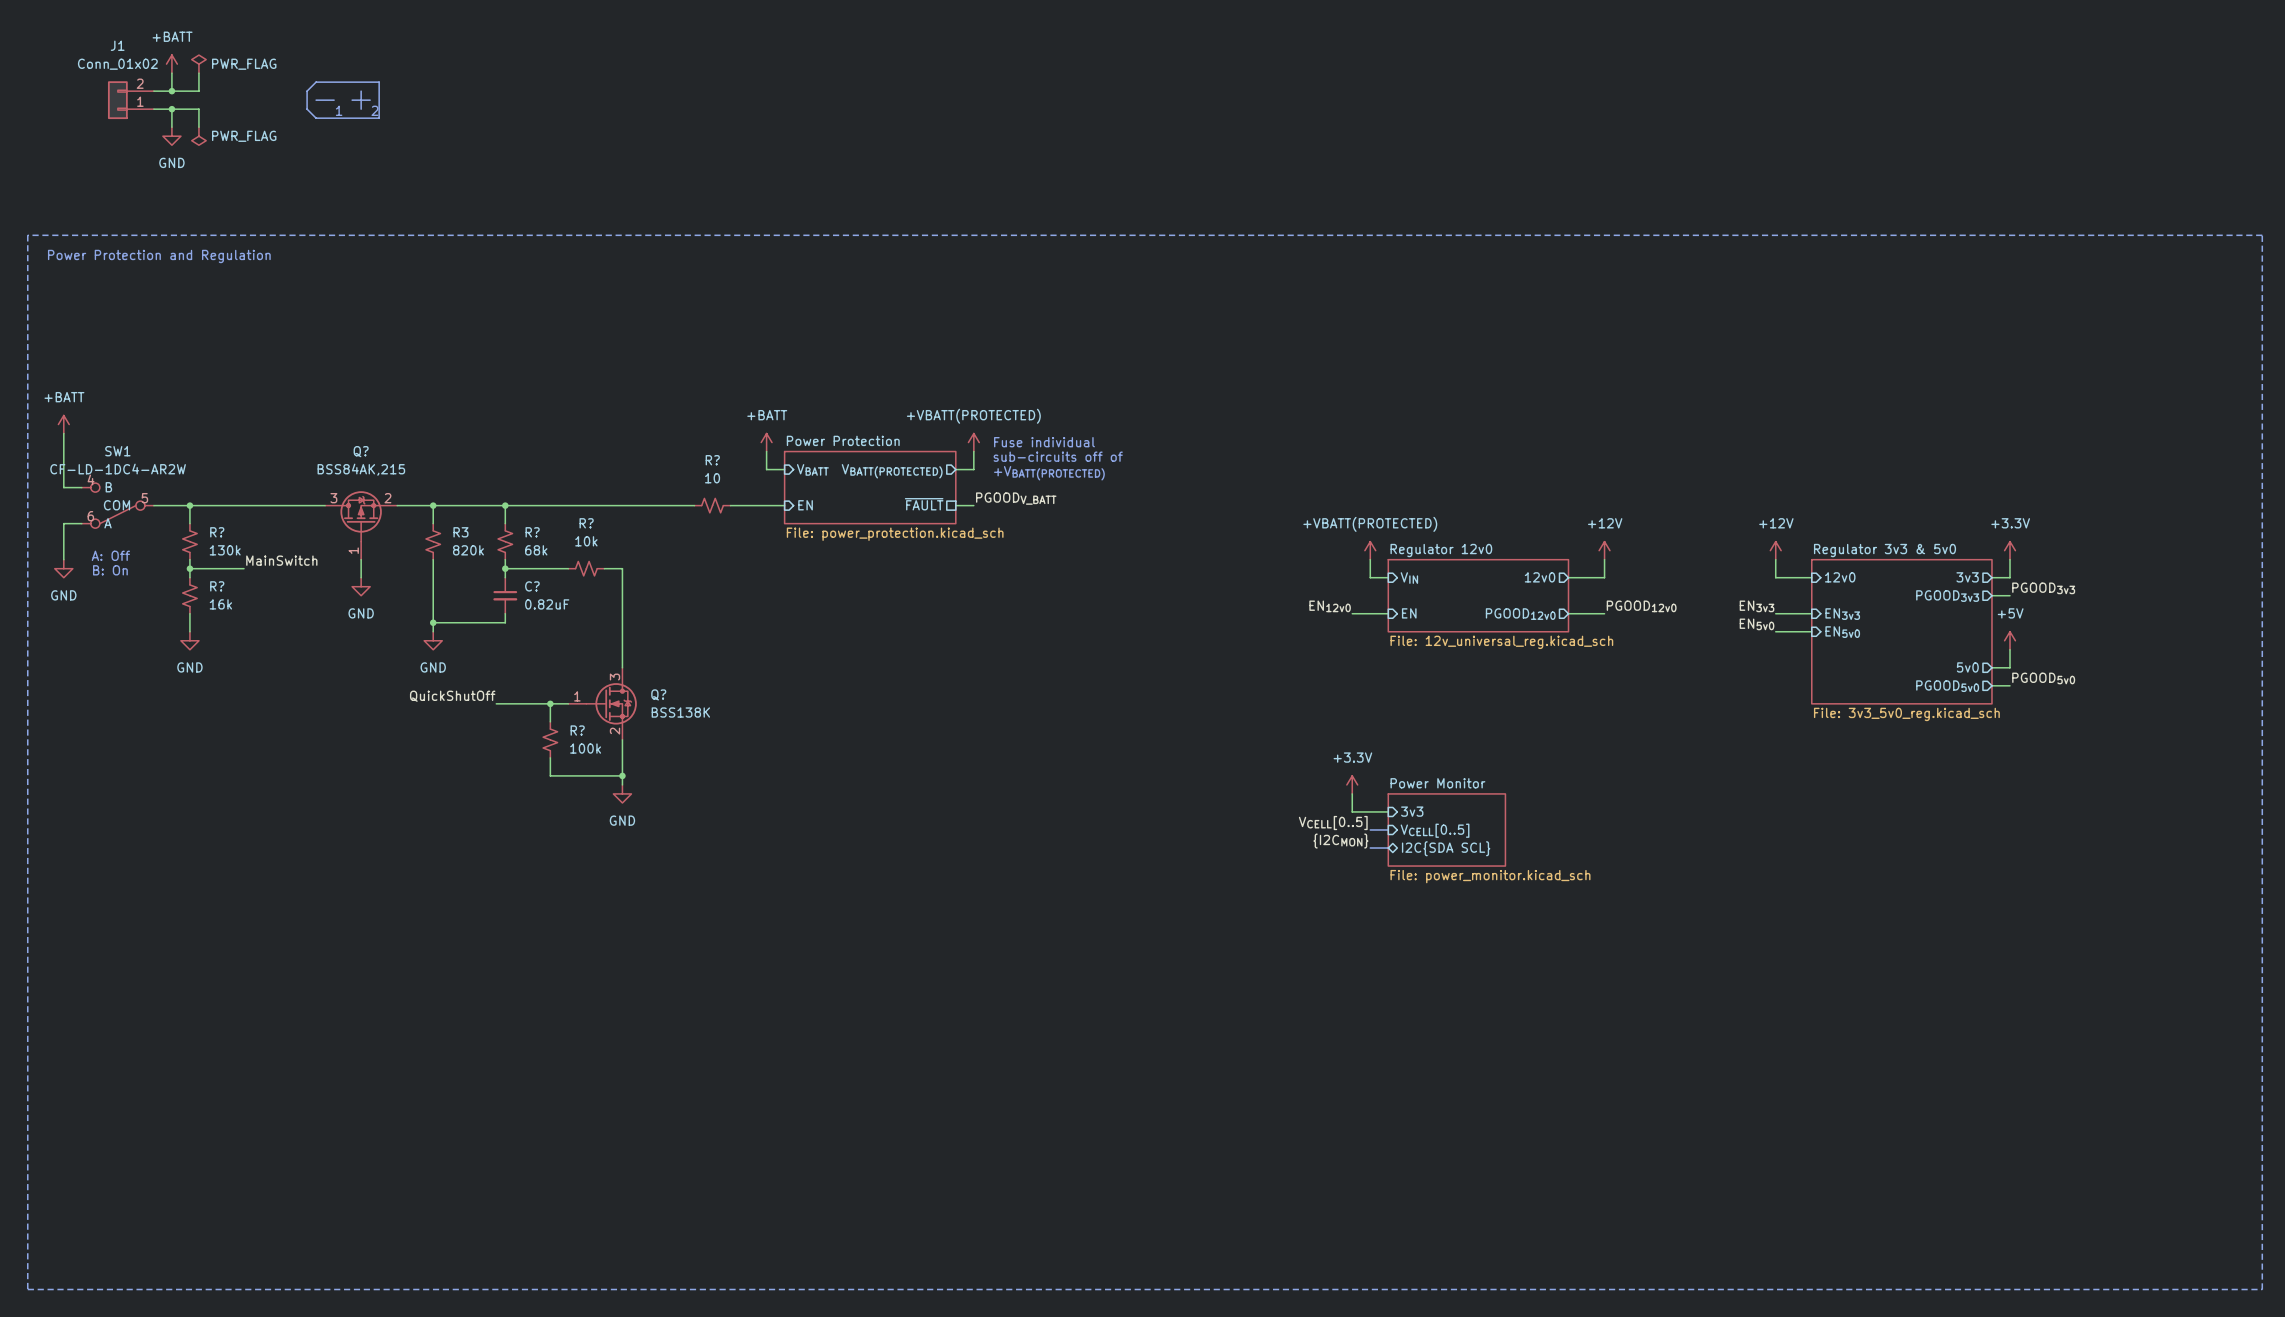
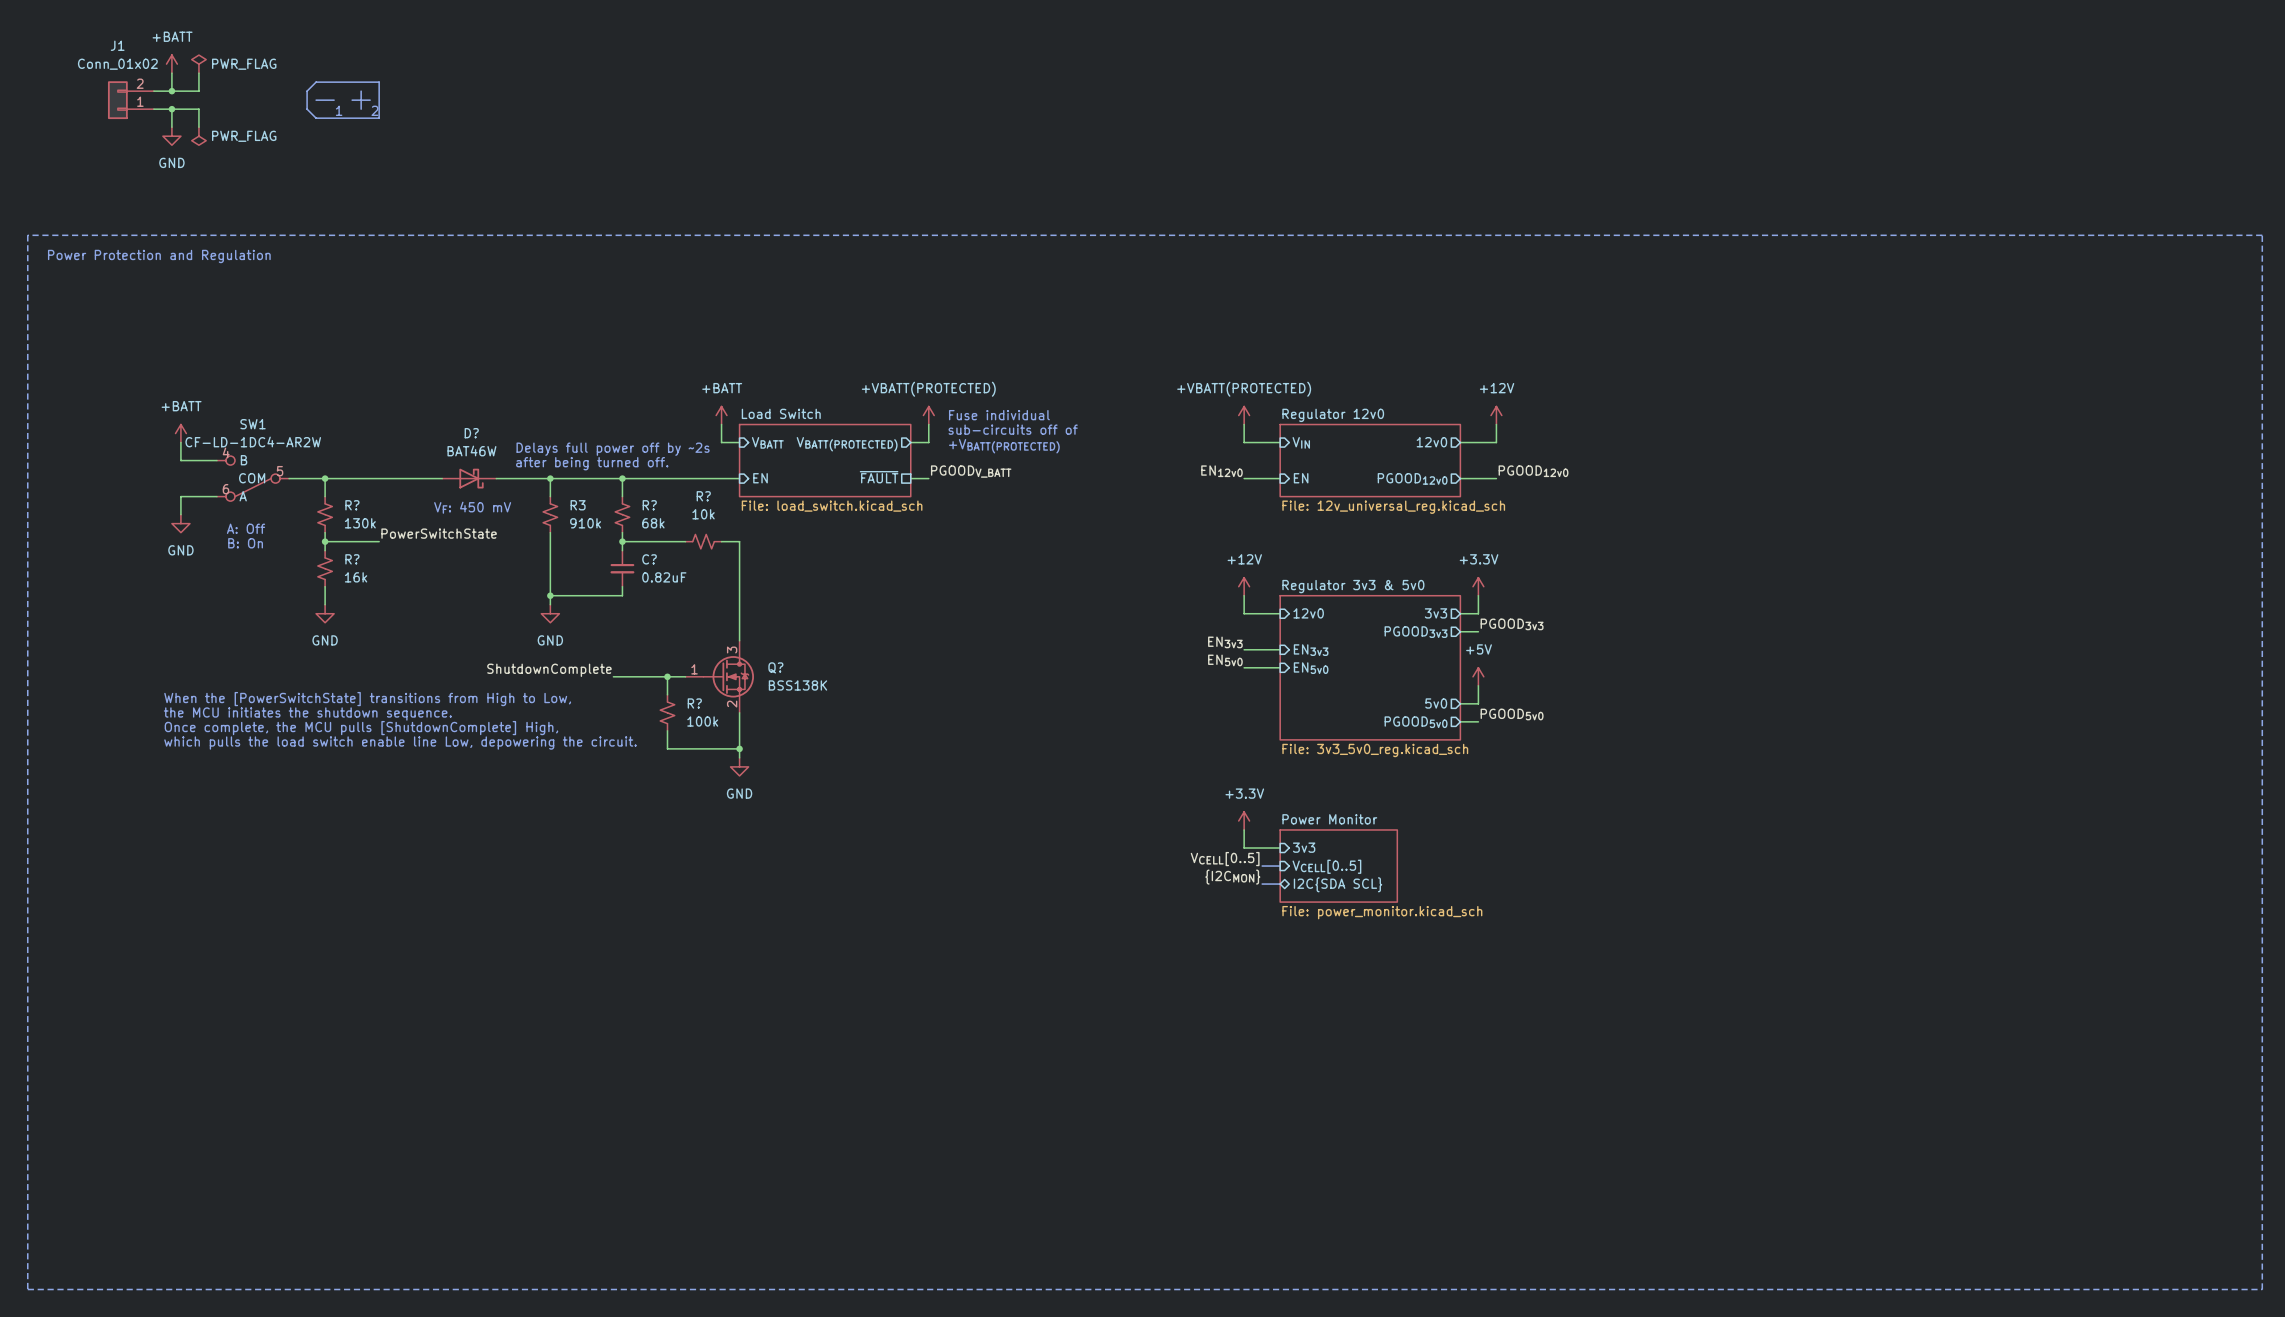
power symbol: none -> +VBATT(PROTECTED) (1244, 415)
power symbol: none -> +12V (1496, 415)
power symbol position: +BATT (63, 424) -> +BATT (180, 433)
wire: none -> (1244, 424) (1244, 442) (1280, 442)
wire: (63, 433) (63, 487) (81, 487) -> none
wire: none -> (180, 442) (180, 460) (216, 460)
power symbol position: +BATT (766, 442) -> +BATT (721, 415)
power symbol position: +VBATT(PROTECTED) (973, 442) -> +VBATT(PROTECTED) (928, 415)
text position: Fuse individual (1044, 442) -> Fuse individual (999, 415)
sheet pin: none -> 12v0 (1431, 442)
text: none -> Delays full power off by ~2s (613, 449)
wire: (766, 451) (766, 469) (784, 469) -> (721, 424) (721, 442) (739, 442)
wire: (973, 451) (973, 469) (955, 469) -> (928, 424) (928, 442) (910, 442)
text position: sub-circuits off of (1058, 456) -> sub-circuits off of (1013, 429)
sheet Load Switch: none -> File: load_switch.kicad_sch (825, 460)
text: none -> after being turned off. (592, 463)
sheet pin position: VBATT (812, 469) -> VBATT (767, 442)
sheet pin position: VBATT(PROTECTED) (892, 471) -> VBATT(PROTECTED) (847, 444)
text position: +VBATT(PROTECTED) (1049, 473) -> +VBATT(PROTECTED) (1004, 446)
wire: none -> (289, 478) (442, 478)
junction: none -> (325, 478)
D?: none -> BAT46W (469, 478)
wire: none -> (496, 478) (739, 478)
junction: none -> (550, 478)
junction: none -> (622, 478)
sheet Power Protection: File: power_protection.kicad_sch (870, 487) -> none
wire: none -> (216, 496) (180, 496) (180, 514)
label position: PGOODV_BATT (1016, 498) -> PGOODV_BATT (971, 471)
sheet pin position: ~{FAULT} (924, 504) -> ~{FAULT} (879, 477)
SW1 position: (117, 505) -> (253, 478)
wire: (153, 505) (325, 505) -> none
wire: (189, 505) (189, 523) -> (325, 478) (325, 496)
junction: (189, 505) -> none
wire: (397, 505) (694, 505) -> none
wire: (433, 505) (433, 523) -> (550, 478) (550, 496)
junction: (433, 505) -> none
wire: (505, 505) (505, 523) -> (622, 478) (622, 496)
junction: (505, 505) -> none
R?: 10 (712, 505) -> none
wire: (730, 505) (784, 505) -> none
sheet pin position: EN (805, 505) -> EN (760, 478)
wire: (955, 505) (973, 505) -> (910, 478) (928, 478)
text: none -> VF: 450 mV (472, 507)
wire: (81, 523) (63, 523) (63, 559) -> none
power symbol: none -> GND (180, 523)
Q?: BSS84AK,215 (361, 525) -> none
label: none -> PowerSwitchState (439, 533)
R? position: (189, 541) -> (325, 514)
junction: none -> (325, 541)
R3 position: (433, 541) -> (550, 514)
R? position: (505, 541) -> (622, 514)
junction: none -> (622, 541)
wire: none -> (721, 541) (739, 541) (739, 640)
R3 value: 820k (468, 550) -> 910k (585, 523)
power symbol: +VBATT(PROTECTED) (1370, 550) -> none
power symbol: +12V (1604, 550) -> none
power symbol: +12V (1775, 550) -> none
power symbol: +3.3V (2010, 550) -> none
text position: A: Off (110, 555) -> A: Off (246, 528)
wire: (189, 559) (189, 577) -> (325, 532) (325, 550)
wire: (361, 559) (361, 577) -> none
wire: (433, 559) (433, 631) -> (550, 532) (550, 604)
wire: (505, 559) (505, 577) -> (622, 532) (622, 550)
wire: (1370, 559) (1370, 577) (1388, 577) -> none
wire: (1604, 559) (1604, 577) (1568, 577) -> (1496, 424) (1496, 442) (1460, 442)
wire: (1775, 559) (1775, 577) (1811, 577) -> none
wire: (2010, 559) (2010, 577) (1991, 577) -> none
label: MainSwitch (281, 560) -> none
power symbol: GND (63, 568) -> none
wire: (189, 568) (244, 568) -> (325, 541) (379, 541)
junction: (189, 568) -> none
wire: (505, 568) (568, 568) -> (622, 541) (685, 541)
junction: (505, 568) -> none
R? position: (586, 568) -> (703, 541)
wire: (604, 568) (622, 568) (622, 586) -> none
text position: B: On (110, 570) -> B: On (245, 543)
sheet pin: 12v0 (1540, 577) -> none
sheet pin: 12v0 (1840, 577) -> none
sheet pin: 3v3 (1967, 577) -> none
sheet pin position: VIN (1409, 578) -> VIN (1301, 442)
power symbol position: GND (361, 586) -> GND (325, 613)
power symbol: none -> +12V (1244, 586)
power symbol: none -> +3.3V (1478, 586)
label: PGOOD3v3 (2043, 588) -> none
R? position: (189, 595) -> (325, 568)
C? position: (505, 595) -> (622, 568)
junction: none -> (550, 595)
wire: (622, 595) (622, 667) -> (622, 595) (550, 595)
wire: none -> (1244, 595) (1244, 613) (1280, 613)
wire: none -> (1478, 595) (1478, 613) (1460, 613)
sheet Regulator 12v0 position: (1478, 595) -> (1370, 460)
wire: (1991, 595) (2010, 595) -> none
sheet pin: PGOOD3v3 (1947, 596) -> none
label position: EN12v0 (1330, 606) -> EN12v0 (1221, 471)
label position: PGOOD12v0 (1641, 606) -> PGOOD12v0 (1533, 471)
label: EN3v3 (1757, 606) -> none
wire: (189, 613) (189, 631) -> (325, 586) (325, 604)
wire: (505, 613) (505, 622) (433, 622) -> none
power symbol: none -> GND (550, 613)
sheet pin: none -> 12v0 (1308, 613)
wire: (1352, 613) (1388, 613) -> (1244, 478) (1280, 478)
sheet pin position: EN (1409, 613) -> EN (1301, 478)
sheet pin: none -> 3v3 (1436, 613)
wire: (1568, 613) (1604, 613) -> (1460, 478) (1496, 478)
wire: (1775, 613) (1811, 613) -> none
sheet pin position: PGOOD12v0 (1520, 614) -> PGOOD12v0 (1412, 478)
sheet pin: EN3v3 (1842, 614) -> none
junction: (433, 622) -> none
label: none -> PGOOD3v3 (1512, 624)
label: EN5v0 (1757, 624) -> none
wire: (1775, 631) (1811, 631) -> none
sheet Regulator 3v3 & 5v0 position: (1901, 631) -> (1370, 667)
sheet pin: none -> PGOOD3v3 (1416, 632)
sheet pin: EN5v0 (1842, 632) -> none
power symbol: GND (189, 640) -> none
power symbol: GND (433, 640) -> none
power symbol: +5V (2010, 640) -> none
label: none -> EN3v3 (1225, 642)
wire: none -> (1244, 649) (1280, 649)
wire: (2010, 649) (2010, 667) (1991, 667) -> none
sheet pin: none -> EN3v3 (1311, 650)
label: none -> EN5v0 (1225, 660)
wire: none -> (1244, 667) (1280, 667)
sheet pin: 5v0 (1967, 667) -> none
sheet pin: none -> EN5v0 (1311, 668)
label: none -> ShutdownComplete (549, 670)
junction: none -> (667, 676)
power symbol: none -> +5V (1478, 676)
label: PGOOD5v0 (2043, 678) -> none
wire: none -> (1478, 685) (1478, 703) (1460, 703)
wire: (1991, 685) (2010, 685) -> none
sheet pin: PGOOD5v0 (1947, 686) -> none
label: QuickShutOff (452, 696) -> none
text: none -> When the [PowerSwitchState] transitions from High to Low, (367, 699)
wire: (496, 703) (568, 703) -> (613, 676) (685, 676)
wire: (550, 703) (550, 721) -> (667, 676) (667, 694)
junction: (550, 703) -> none
Q? position: (602, 703) -> (719, 676)
sheet pin: none -> 5v0 (1436, 703)
text: none -> the MCU initiates the shutdown sequence. (307, 714)
label: none -> PGOOD5v0 (1512, 714)
wire: none -> (1460, 721) (1478, 721)
sheet pin: none -> PGOOD5v0 (1416, 722)
text: none -> Once complete, the MCU pulls [ShutdownComplete] High, (361, 728)
R? position: (550, 739) -> (667, 712)
wire: (622, 739) (622, 784) -> (739, 712) (739, 757)
text: none -> which pulls the load switch enable line Low, depowering the circuit. (400, 743)
junction: none -> (739, 748)
wire: (550, 757) (550, 775) (622, 775) -> (667, 730) (667, 748) (739, 748)
power symbol: none -> GND (739, 766)
junction: (622, 775) -> none
power symbol position: +3.3V (1352, 784) -> +3.3V (1244, 820)
power symbol: GND (622, 793) -> none
wire: (1352, 793) (1352, 811) (1388, 811) -> (1244, 829) (1244, 848) (1280, 848)
sheet pin: 3v3 (1412, 811) -> none
label position: VCELL[0..5] (1333, 823) -> VCELL[0..5] (1225, 859)
bus: (1370, 829) (1388, 829) -> (1262, 866) (1280, 866)
sheet Power Monitor position: (1446, 829) -> (1338, 866)
sheet pin position: VCELL[0..5] (1435, 830) -> VCELL[0..5] (1326, 866)
label position: {I2CMON} (1340, 841) -> {I2CMON} (1232, 877)
sheet pin: none -> 3v3 (1304, 847)
bus: (1370, 848) (1388, 848) -> (1262, 884) (1280, 884)
sheet pin position: I2C{SDA SCL} (1446, 848) -> I2C{SDA SCL} (1338, 884)

